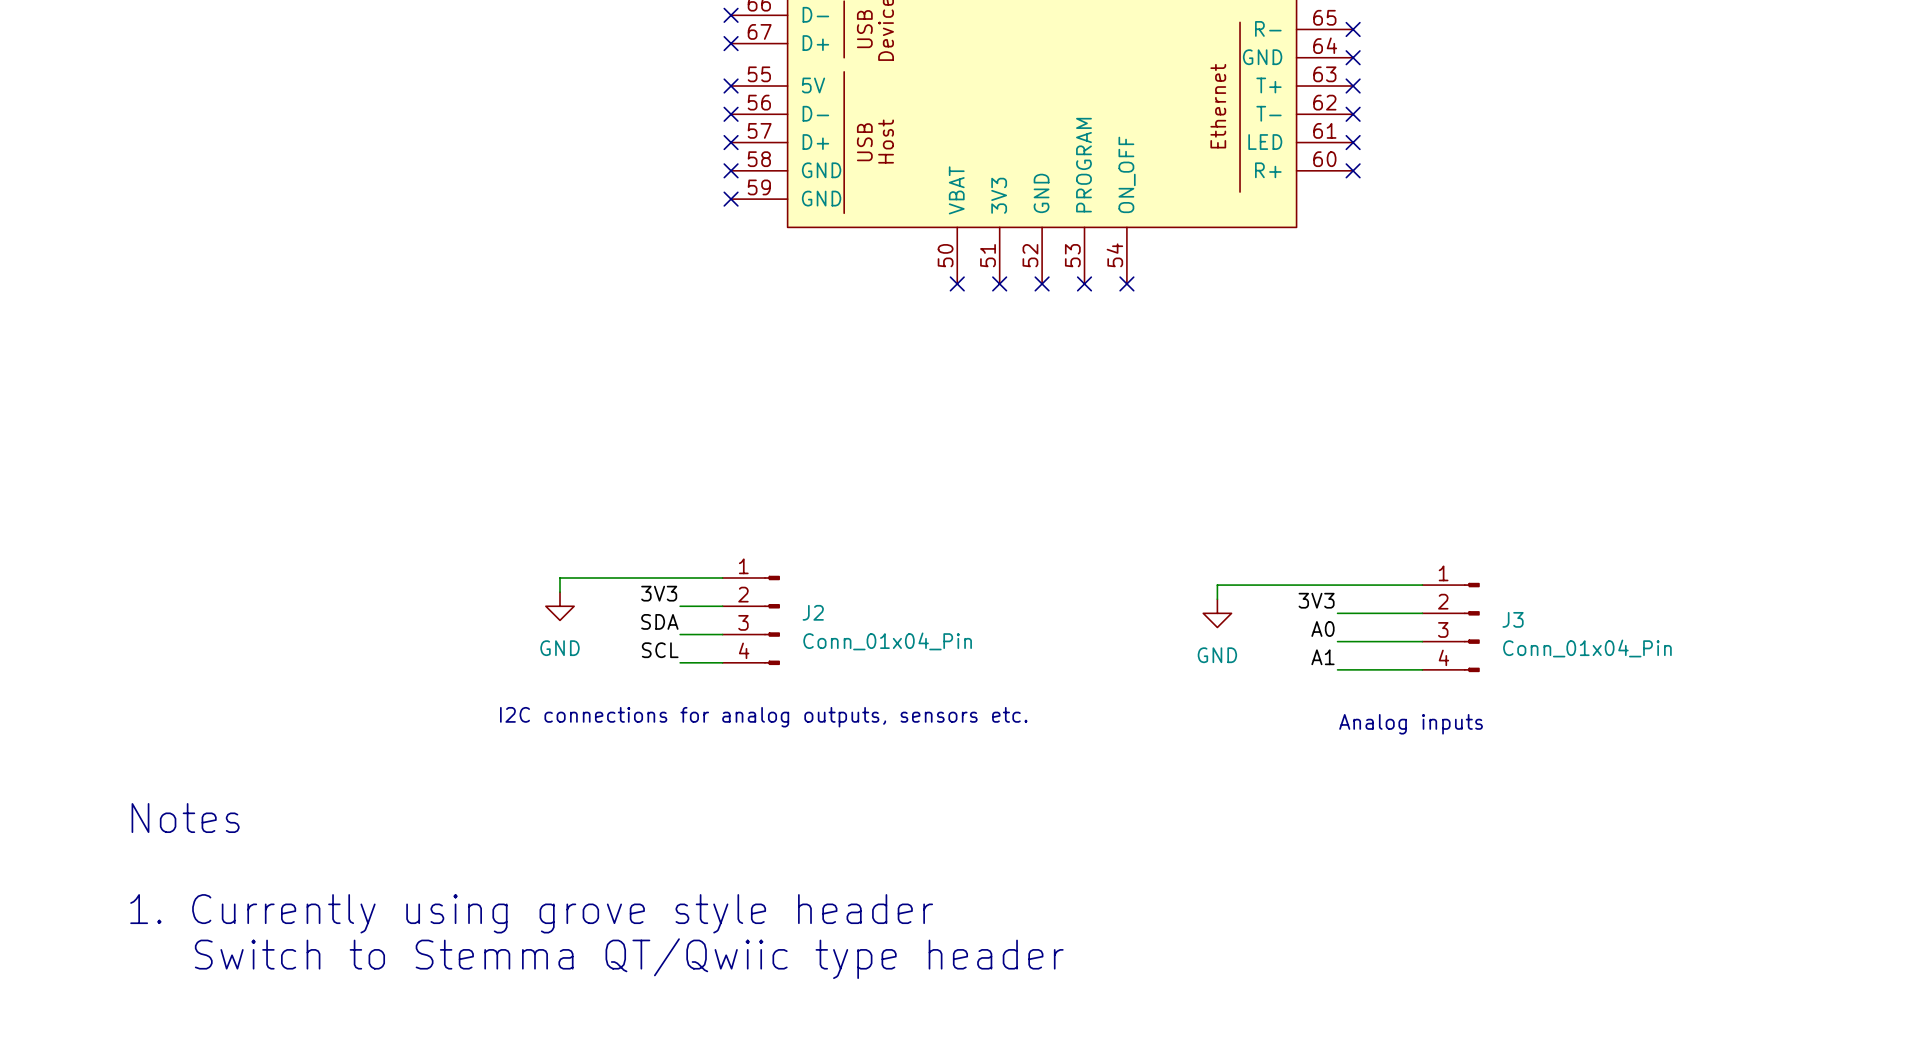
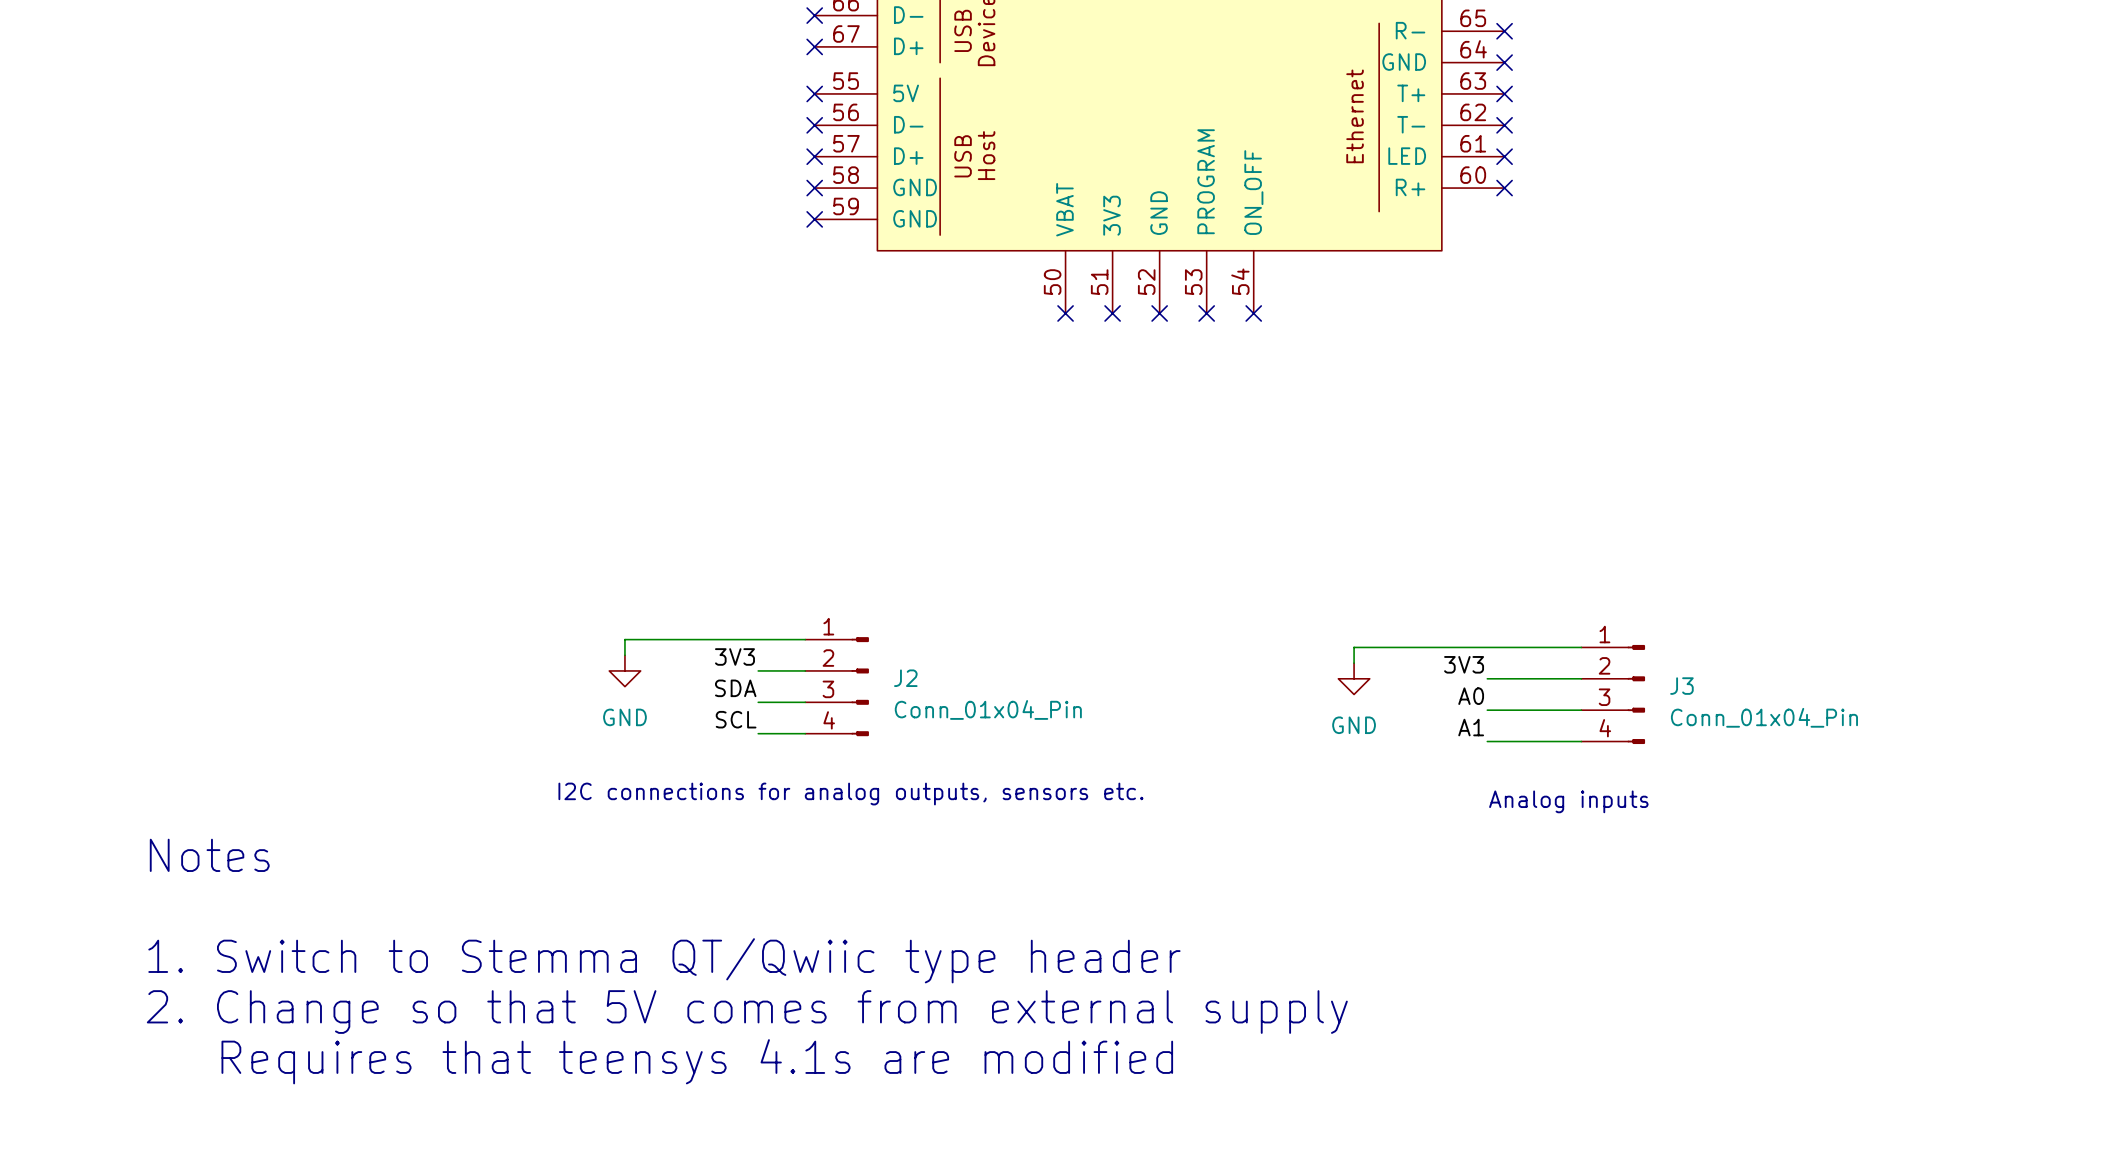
text position: Notes (185, 818) -> Notes (209, 855)
text: none -> 1. Switch to Stemma QT/Qwiic type header (664, 960)
text: 1. Currently using grove style header (531, 913) -> 2. Change so that 5V comes from external supply (747, 1012)
text: Switch to Stemma QT/Qwiic type header (629, 958) -> Requires that teensys 4.1s are modified (697, 1061)

